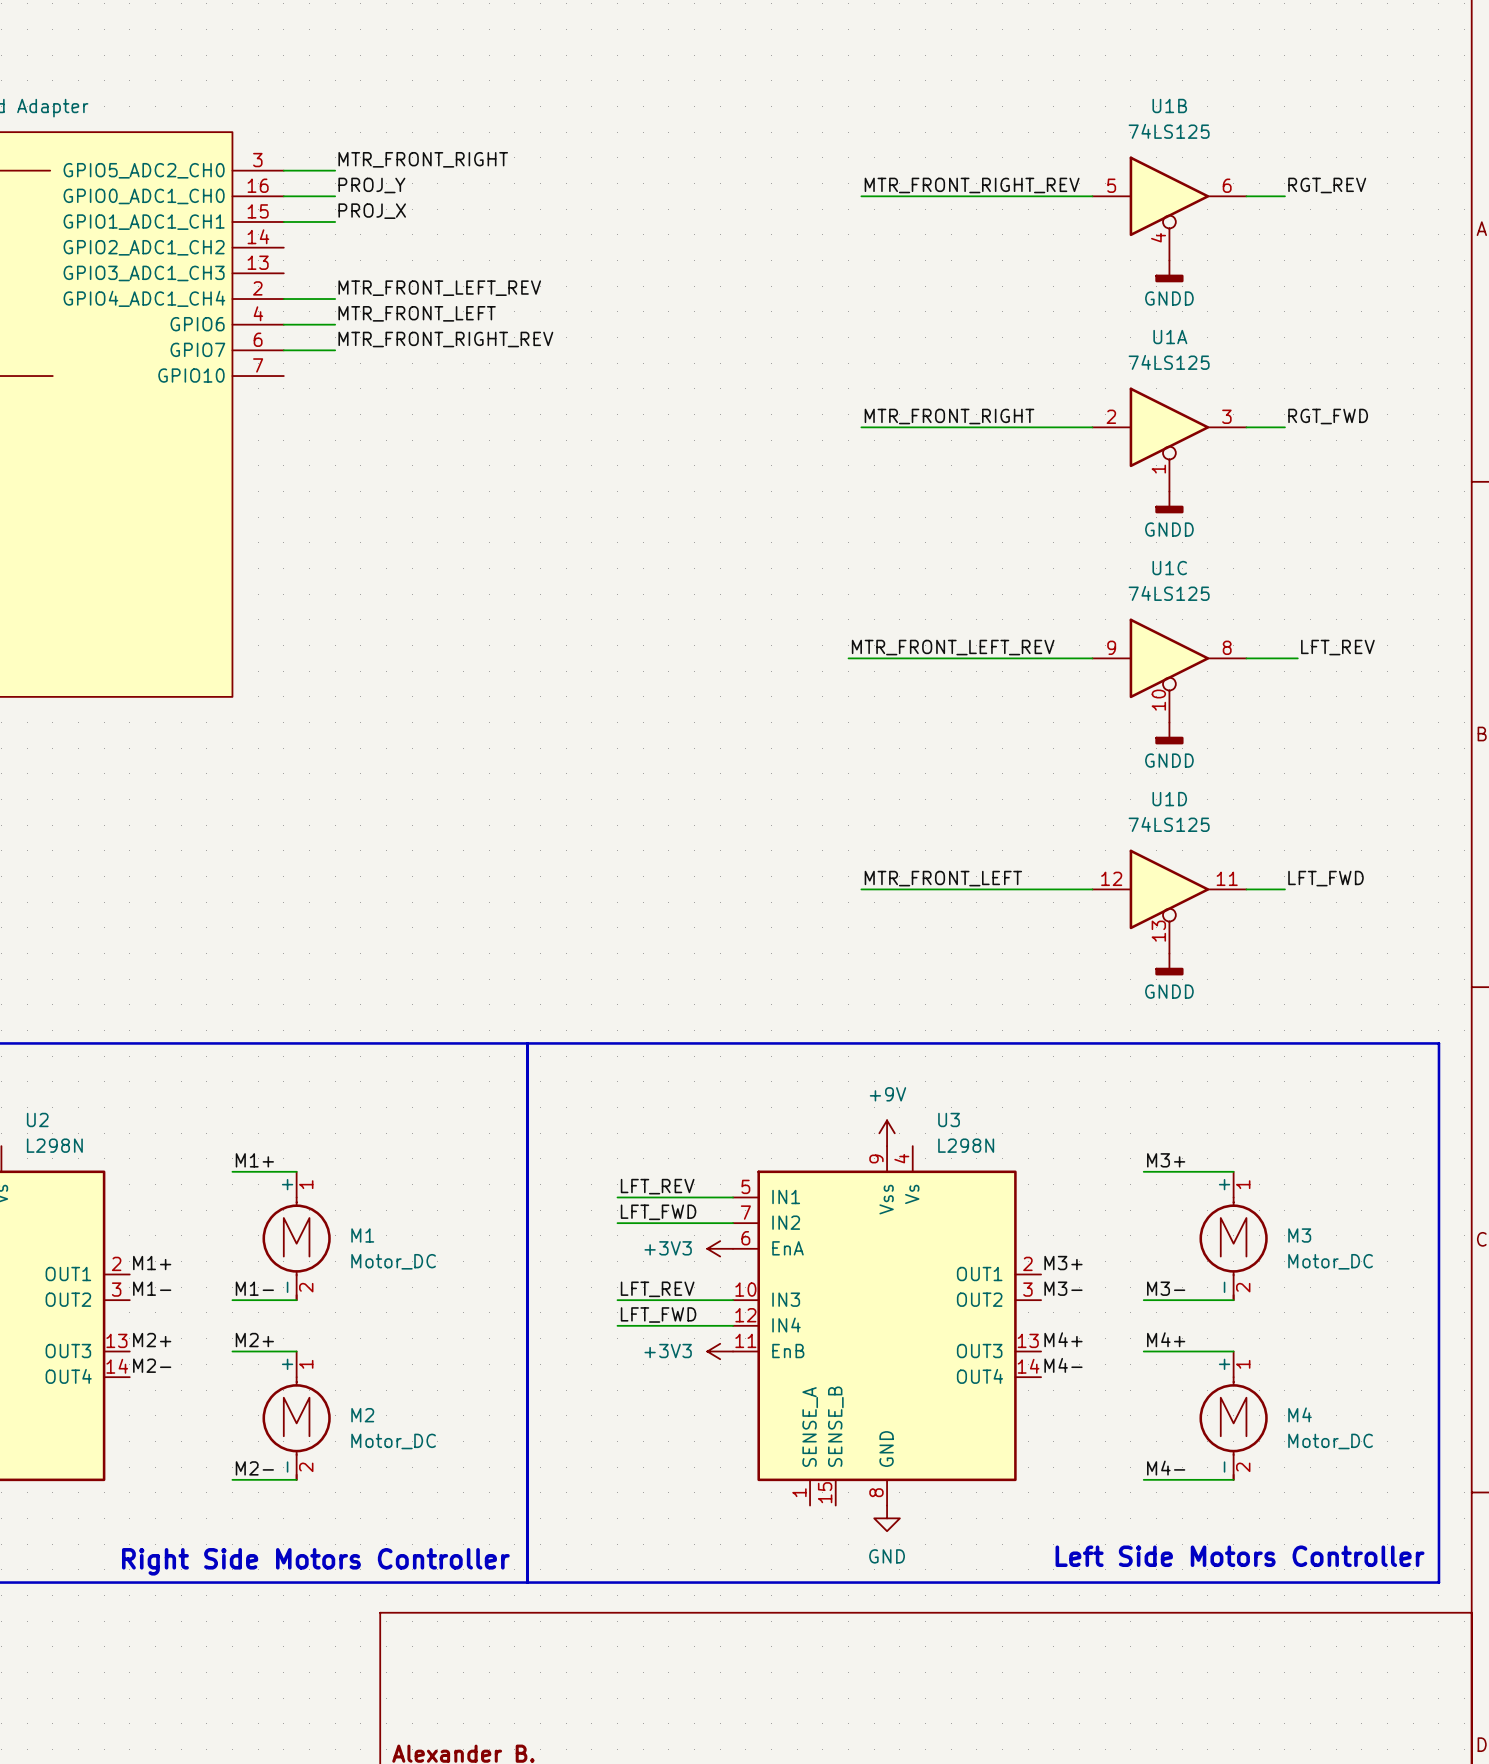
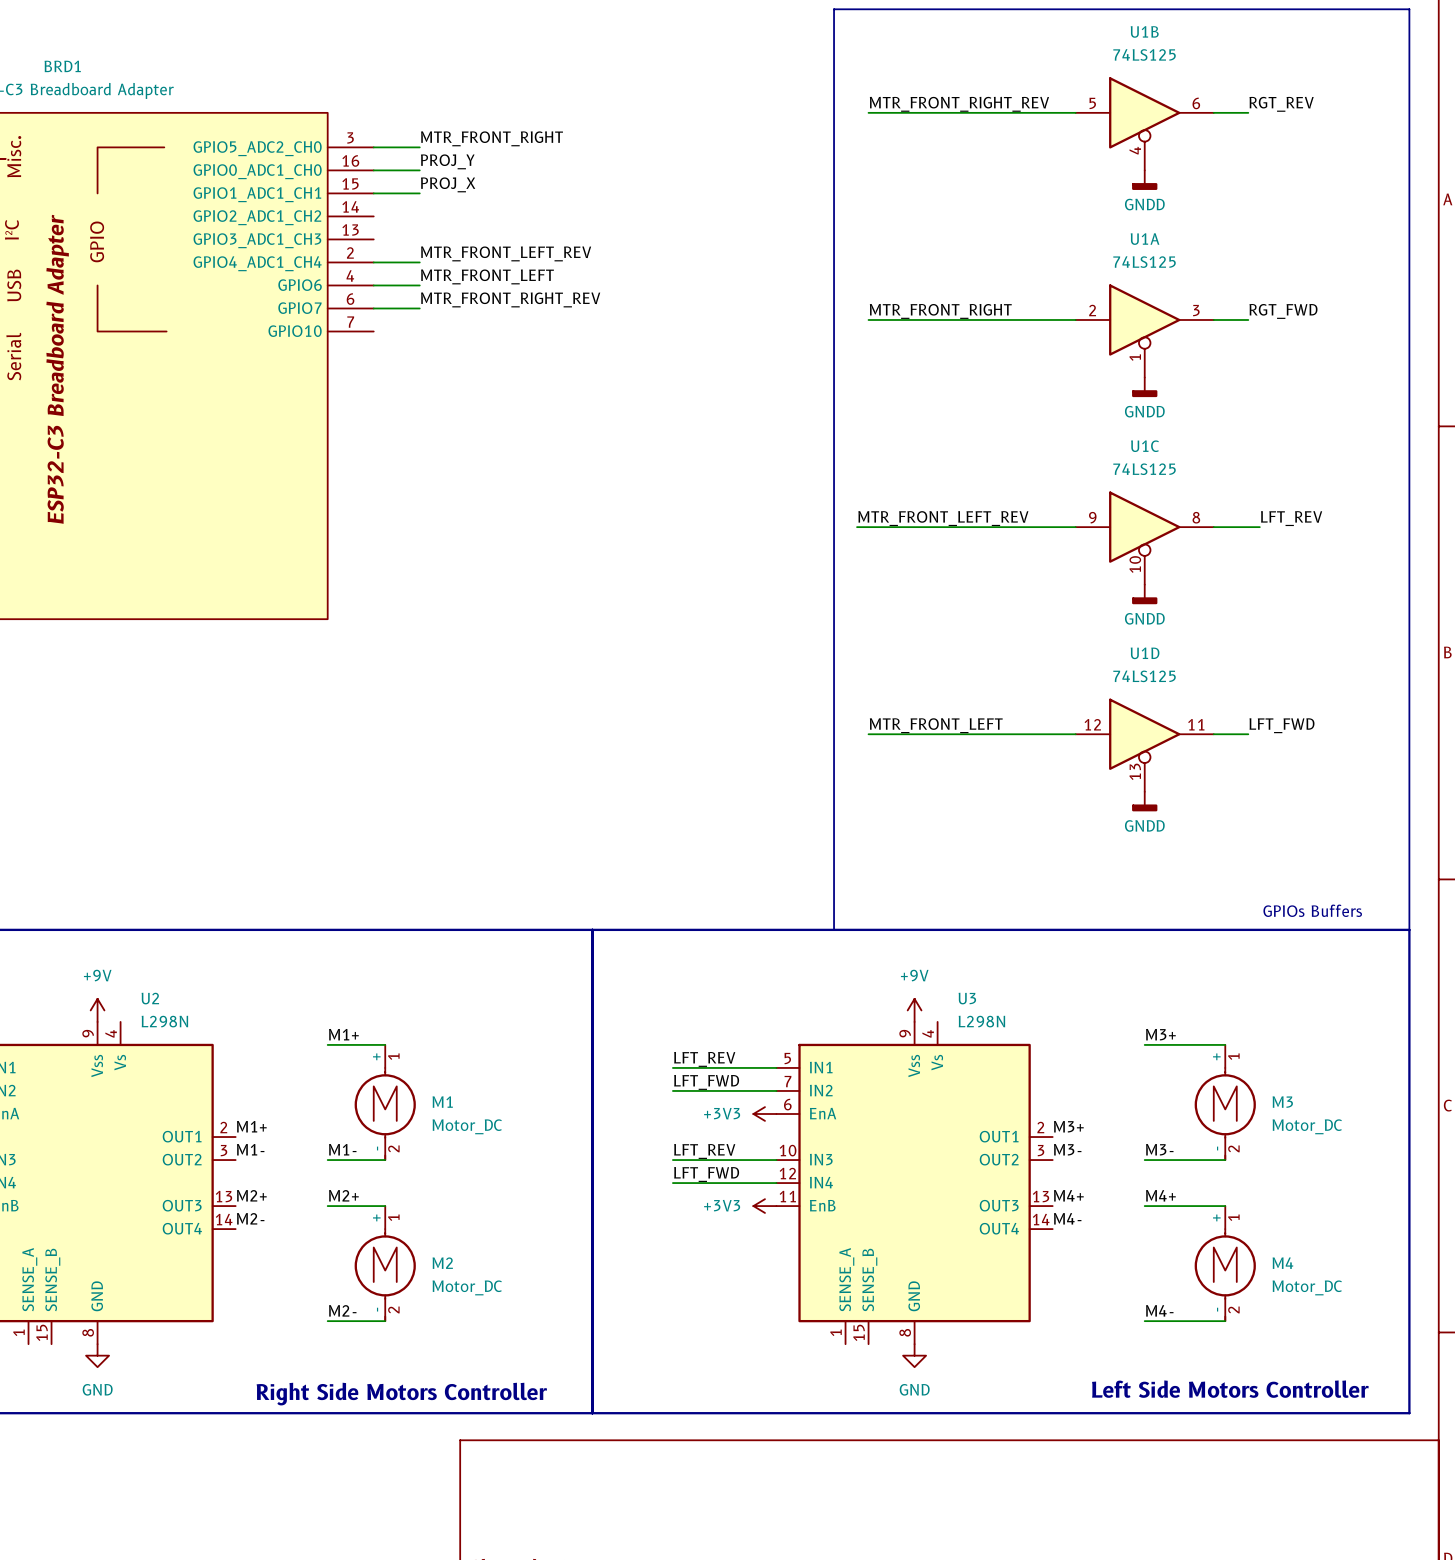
line: none -> (834, 9) (1409, 9) (1409, 929) (834, 929) (834, 9)
label position: MTR_FRONT_RIGHT_REV (972, 185) -> MTR_FRONT_RIGHT_REV (959, 104)
label position: RGT_REV (1327, 185) -> RGT_REV (1281, 104)
wire: (861, 196) (1092, 196) -> (868, 112) (1075, 112)
wire: (1246, 196) (1284, 196) -> (1213, 112) (1248, 112)
U1B position: (1169, 208) -> (1144, 123)
power symbol position: GNDD (1169, 271) -> GNDD (1144, 180)
label position: MTR_FRONT_RIGHT (949, 416) -> MTR_FRONT_RIGHT (940, 311)
label position: RGT_FWD (1328, 416) -> RGT_FWD (1283, 311)
wire: (861, 427) (1092, 427) -> (868, 319) (1075, 319)
wire: (1246, 427) (1284, 427) -> (1213, 319) (1248, 319)
U1A position: (1169, 439) -> (1144, 330)
power symbol position: GNDD (1169, 502) -> GNDD (1144, 387)
label position: MTR_FRONT_LEFT_REV (953, 647) -> MTR_FRONT_LEFT_REV (943, 518)
label position: LFT_REV (1337, 647) -> LFT_REV (1291, 518)
wire: (848, 658) (1092, 658) -> (857, 527) (1075, 527)
wire: (1246, 658) (1297, 658) -> (1213, 527) (1259, 527)
U1C position: (1169, 670) -> (1144, 538)
power symbol position: GNDD (1169, 733) -> GNDD (1144, 594)
label position: MTR_FRONT_LEFT (943, 878) -> MTR_FRONT_LEFT (936, 725)
label position: LFT_FWD (1325, 878) -> LFT_FWD (1281, 725)
wire: (861, 889) (1092, 889) -> (868, 734) (1075, 734)
wire: (1246, 889) (1284, 889) -> (1213, 734) (1248, 734)
U1D position: (1169, 901) -> (1144, 745)
power symbol position: GNDD (1169, 964) -> GNDD (1144, 801)
text: none -> GPIOs Buffers (1312, 910)

